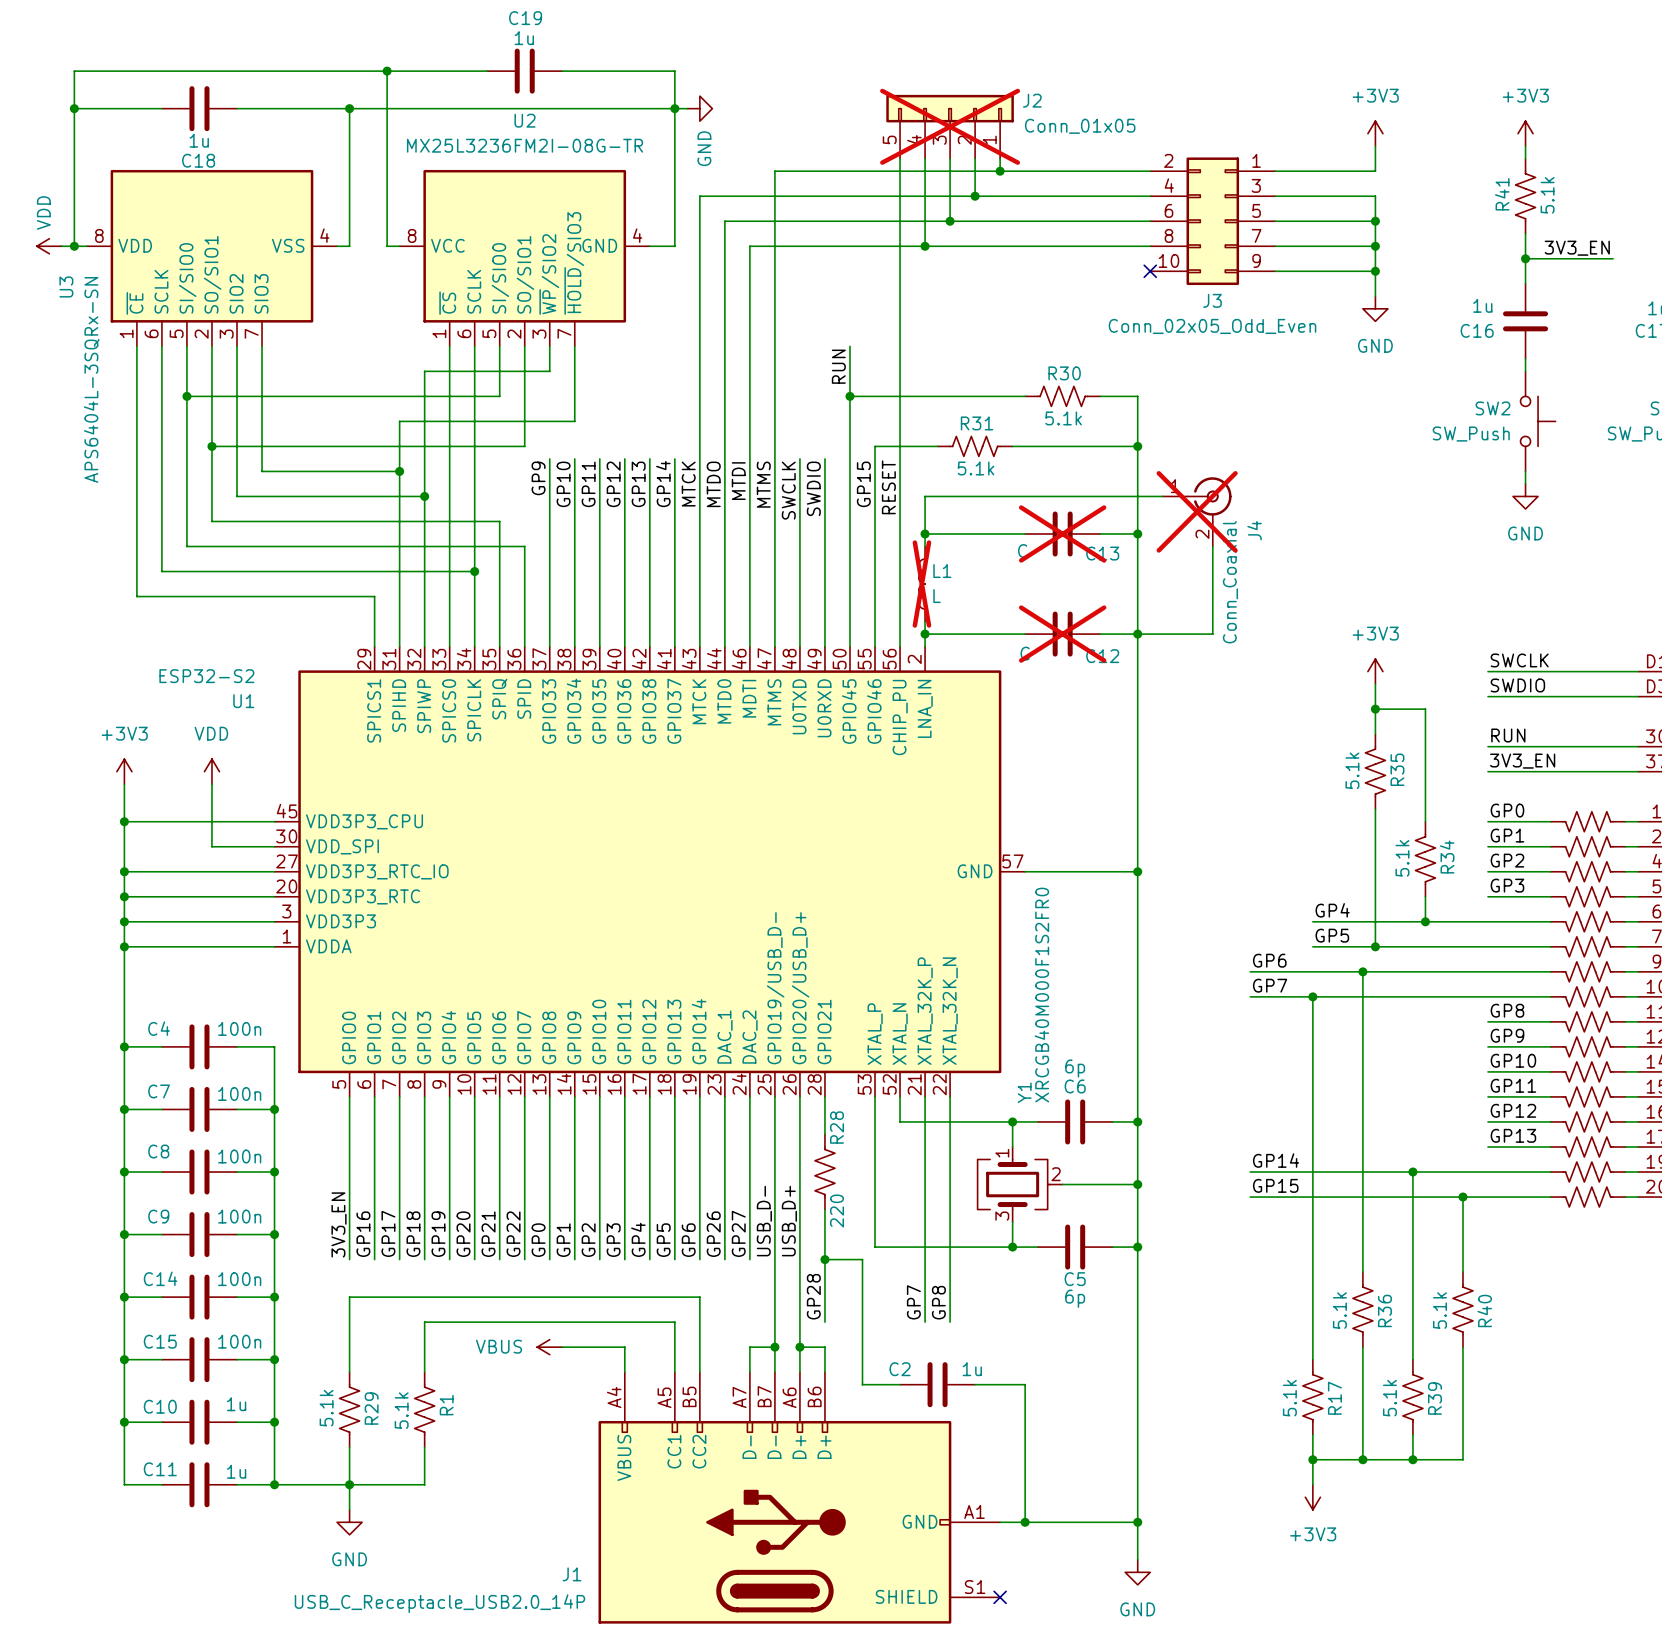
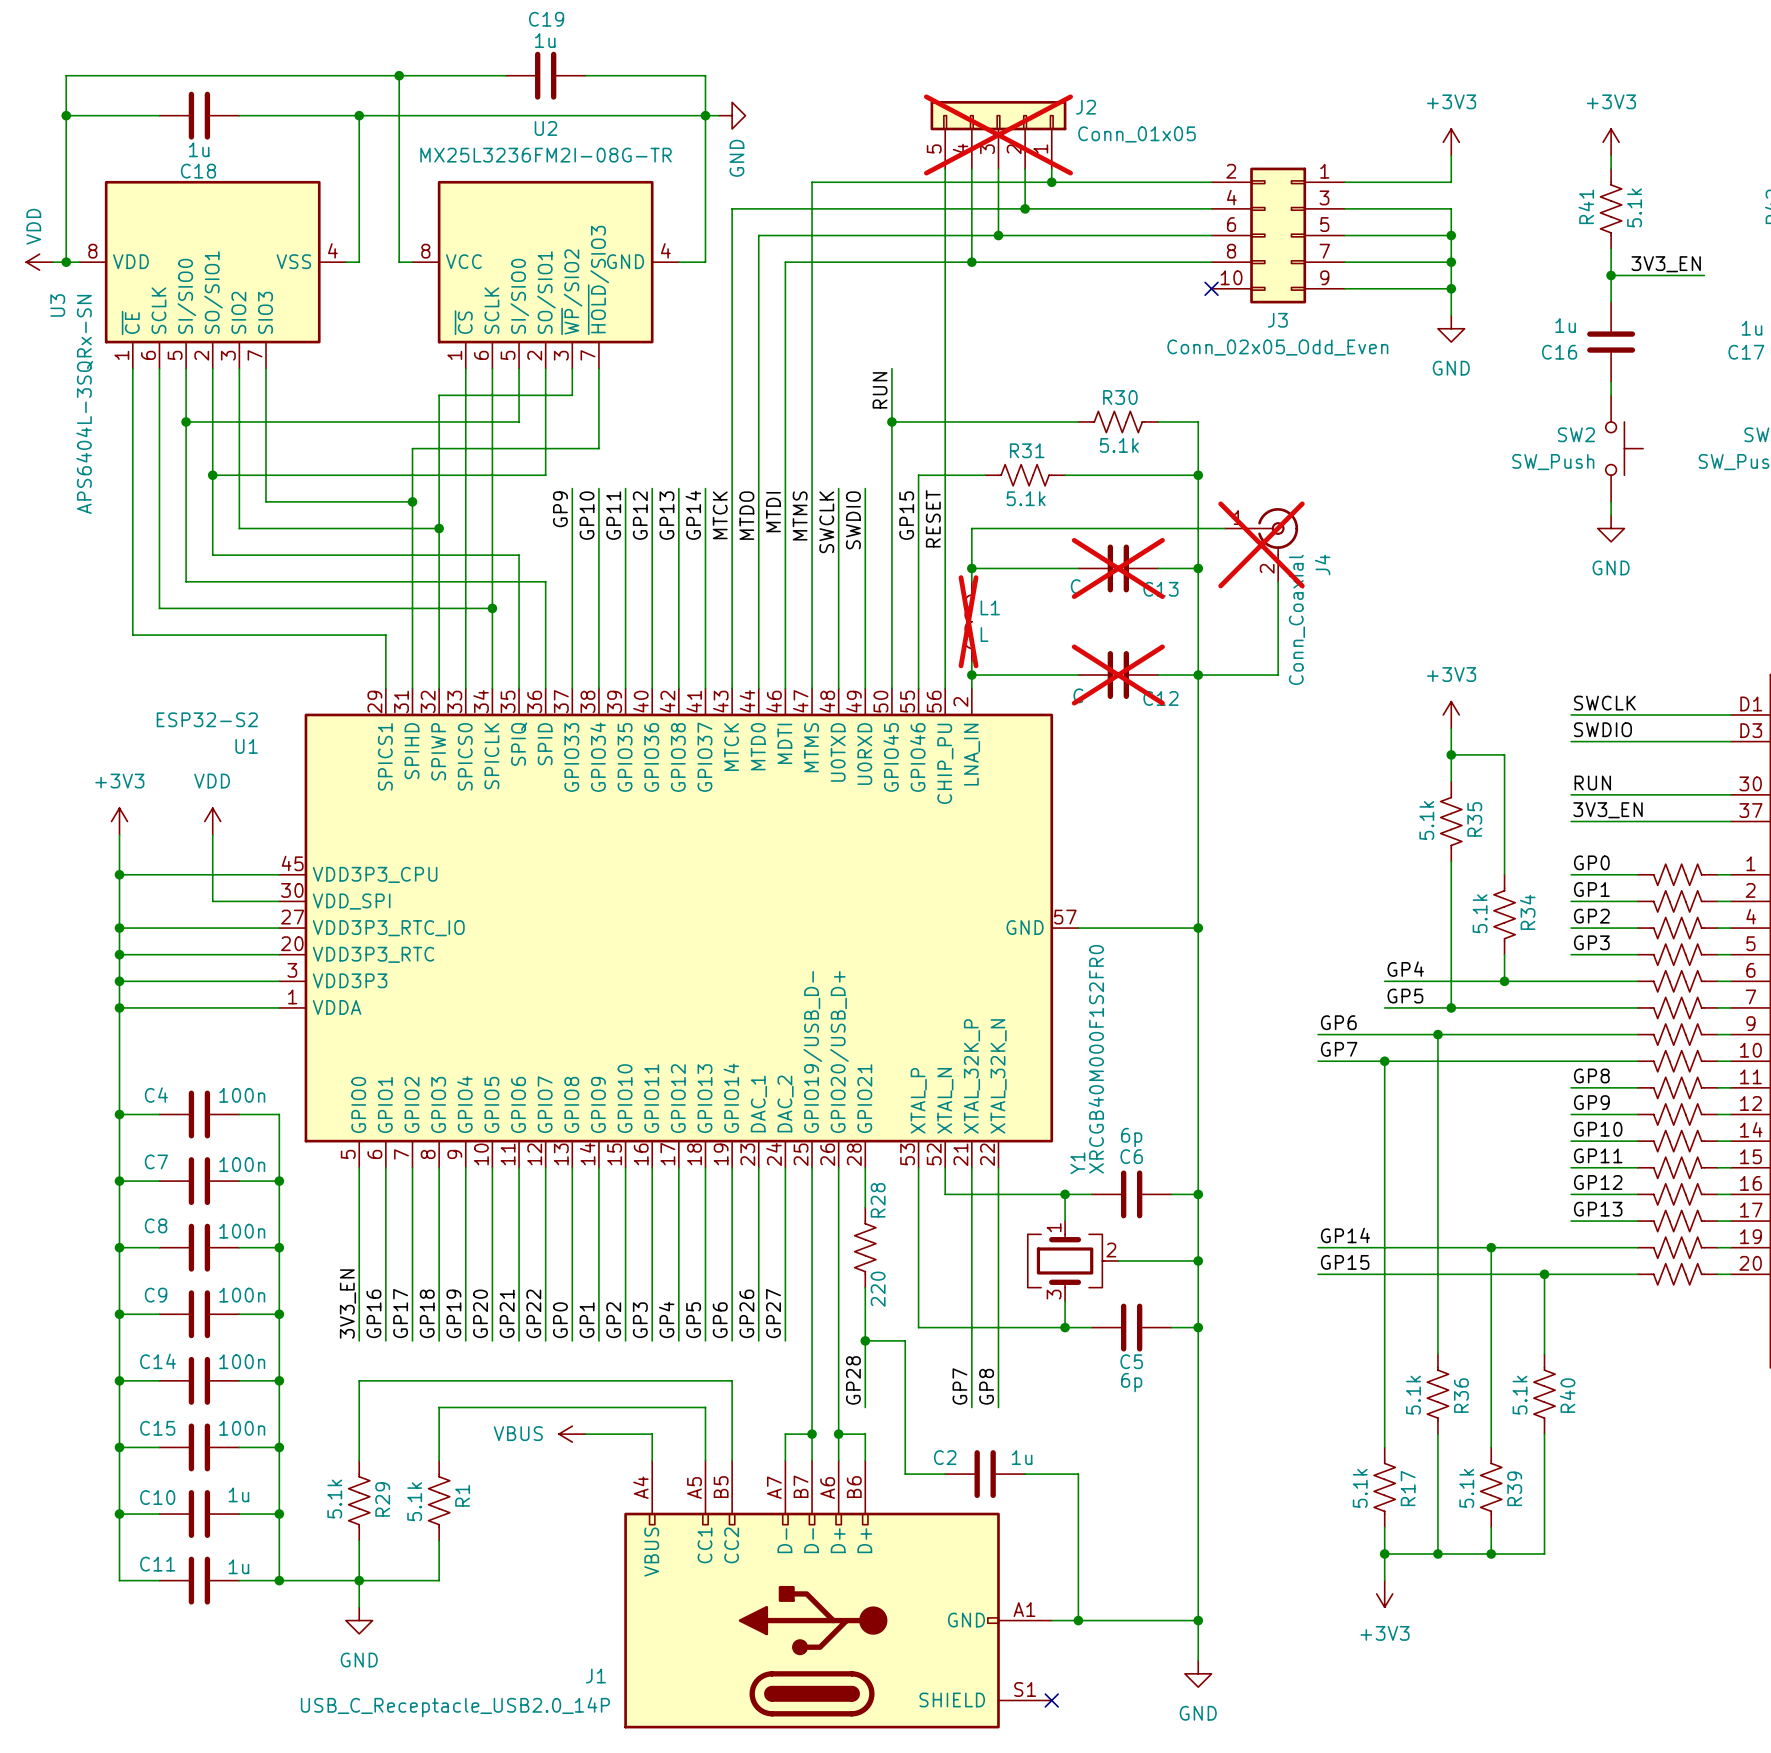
label: USB_D- (764, 1221) -> none
label: USB_D+ (789, 1221) -> none

